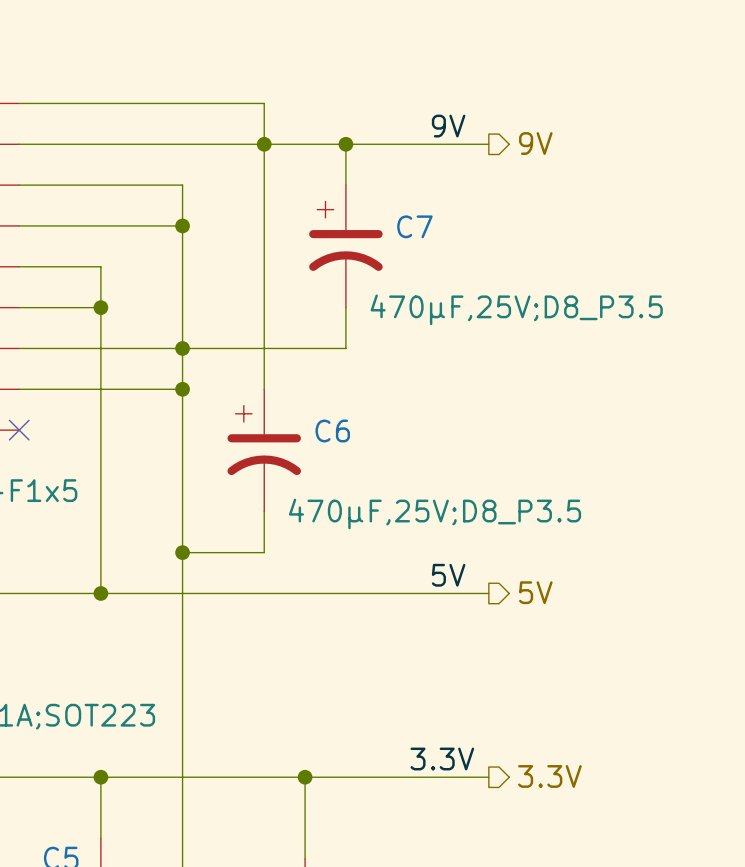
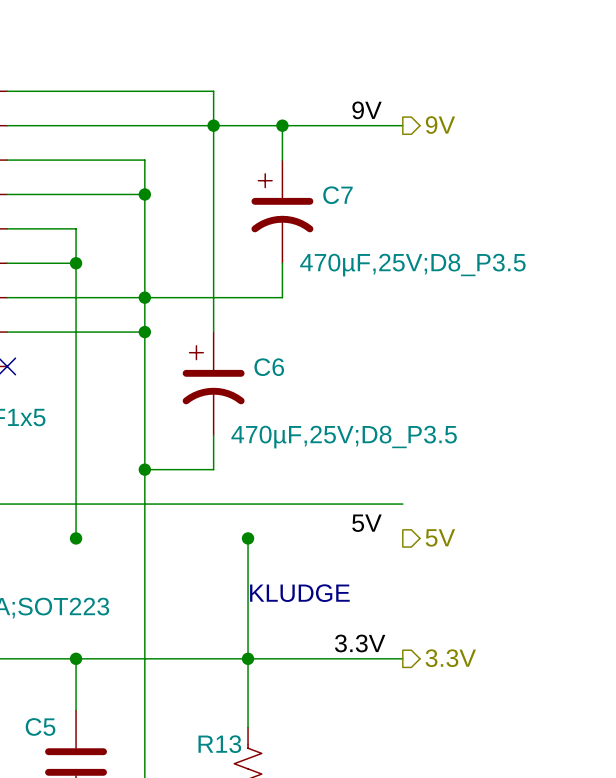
label position: 5V (448, 575) -> 5V (366, 523)
hierarchical label position: 5V (535, 592) -> 5V (440, 537)
wire: none -> (76, 504) (76, 538)
junction position: (100, 593) -> (76, 538)
wire: none -> (248, 538) (248, 658)
junction: none -> (248, 538)
text: none -> KLUDGE (299, 593)

